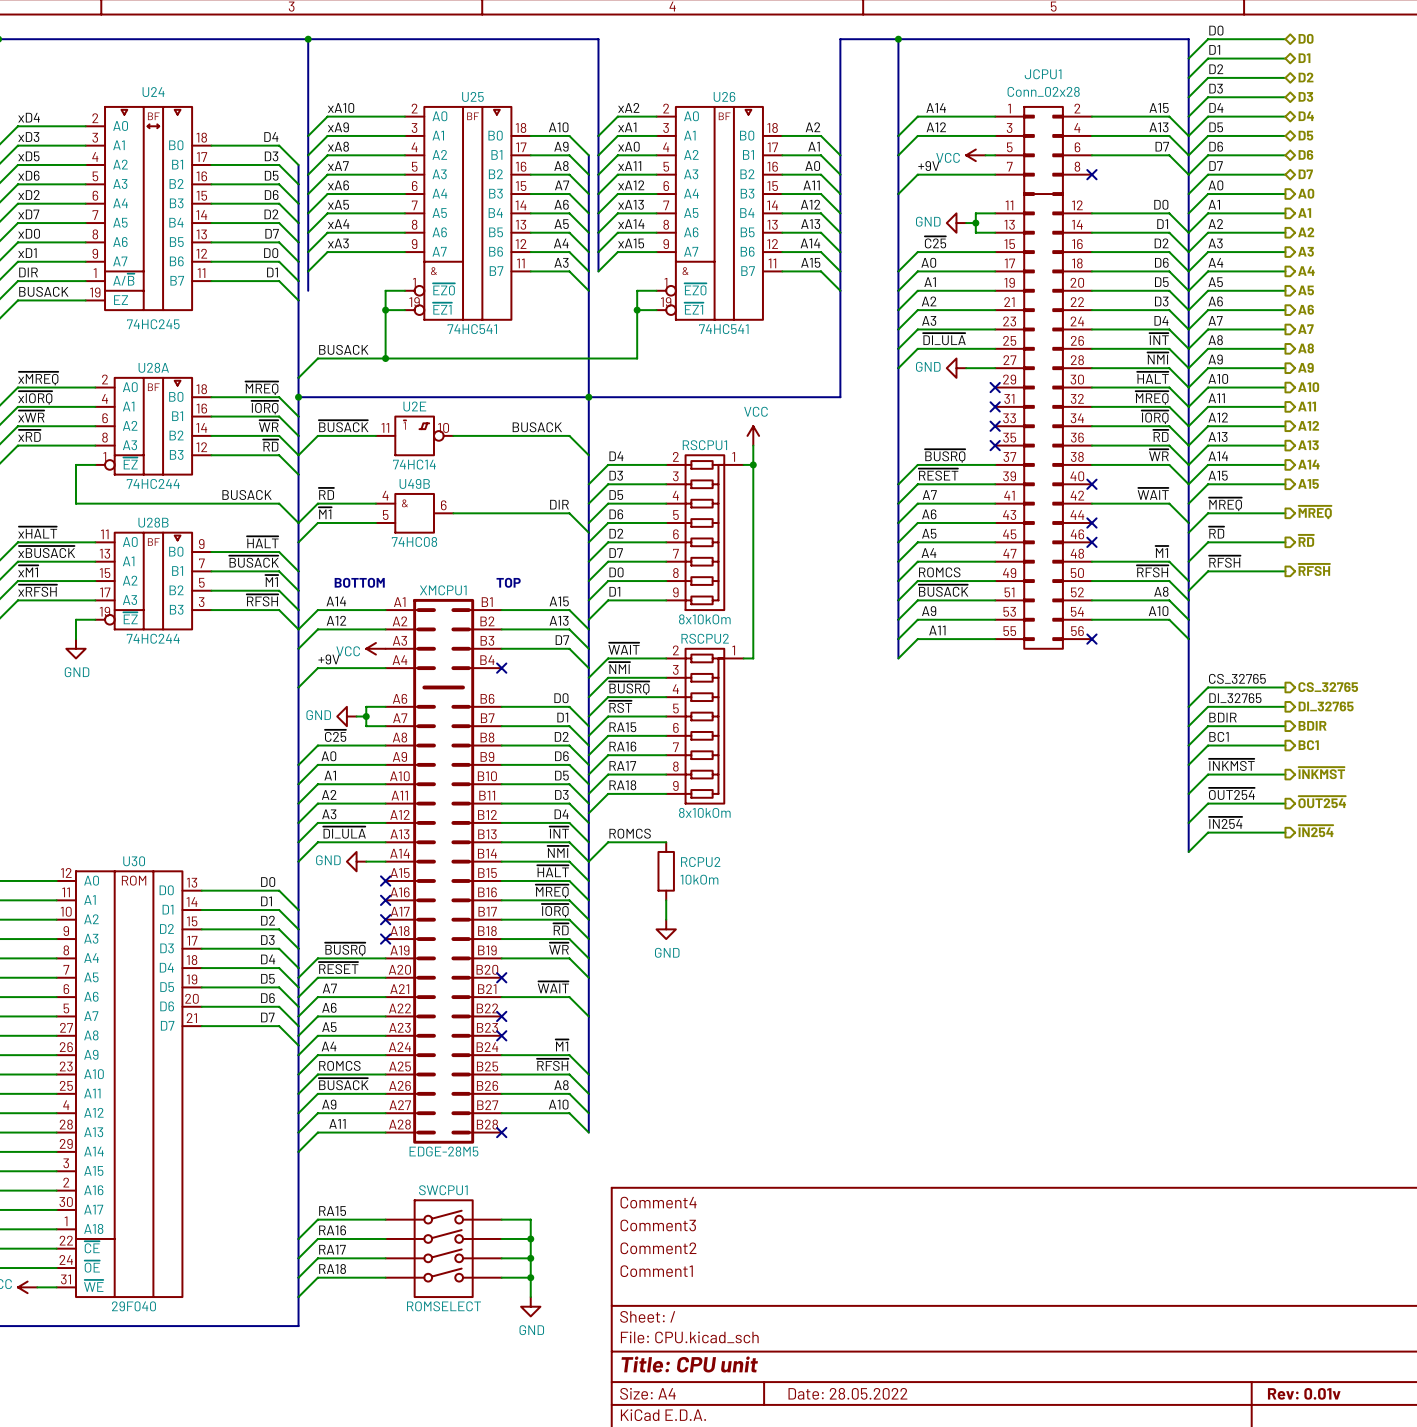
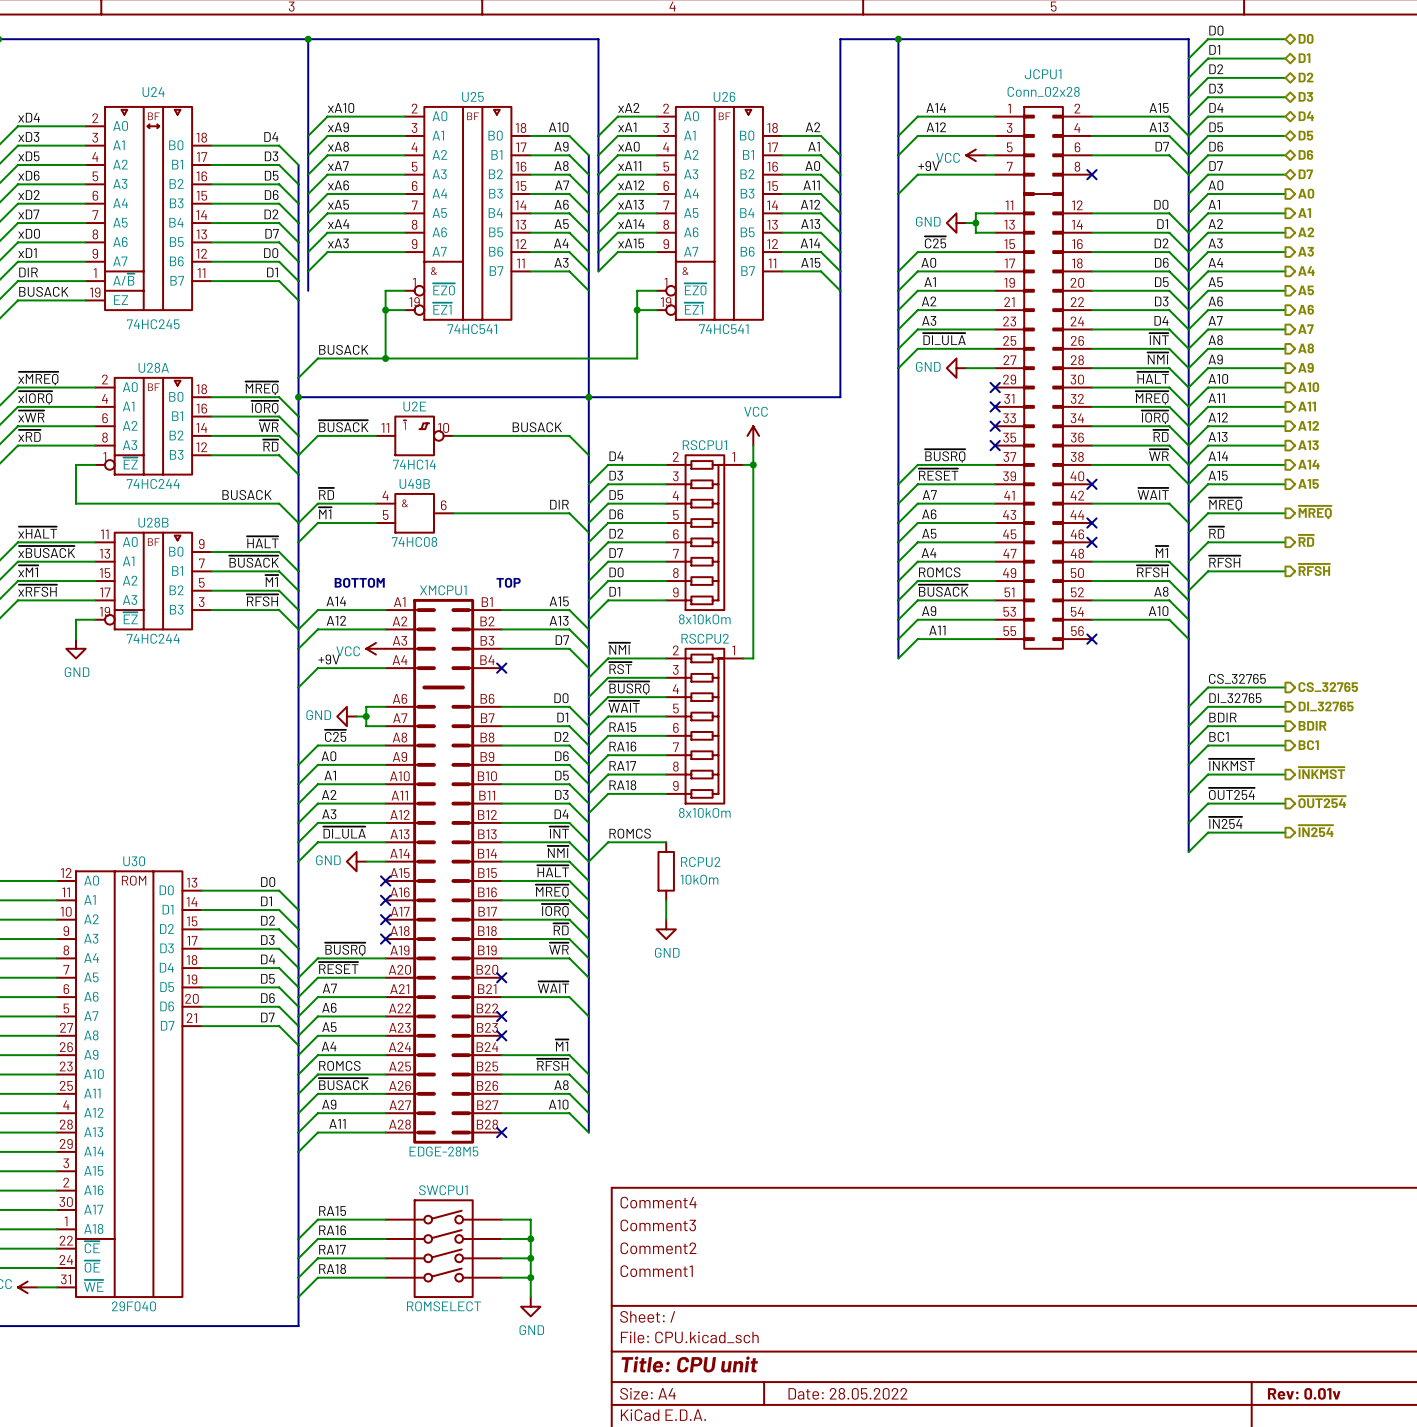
label: ~{WAIT} (624, 648) -> ~{NMI} (619, 648)
label: ~{NMI} (619, 668) -> ~{RST} (620, 668)
label: ~{RST} (620, 706) -> ~{WAIT} (624, 706)

